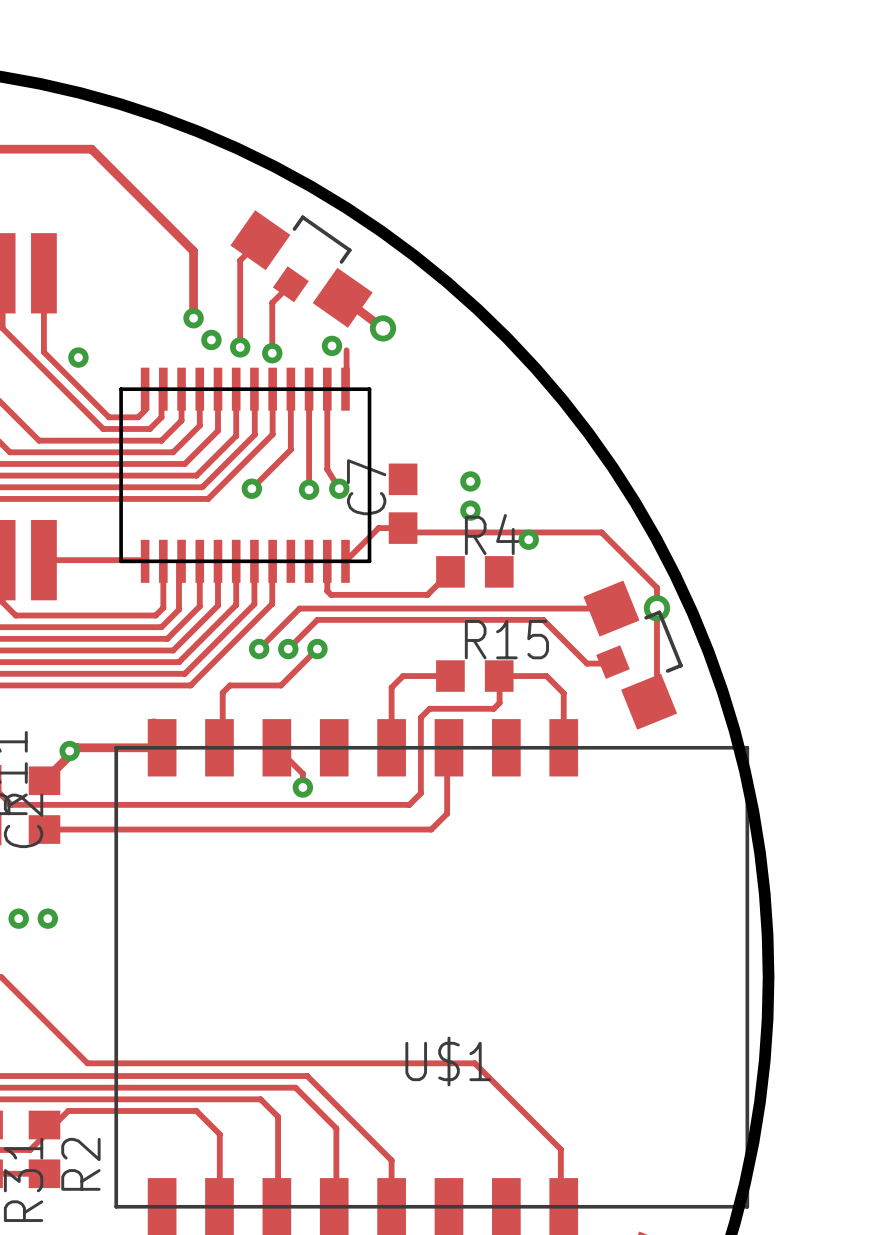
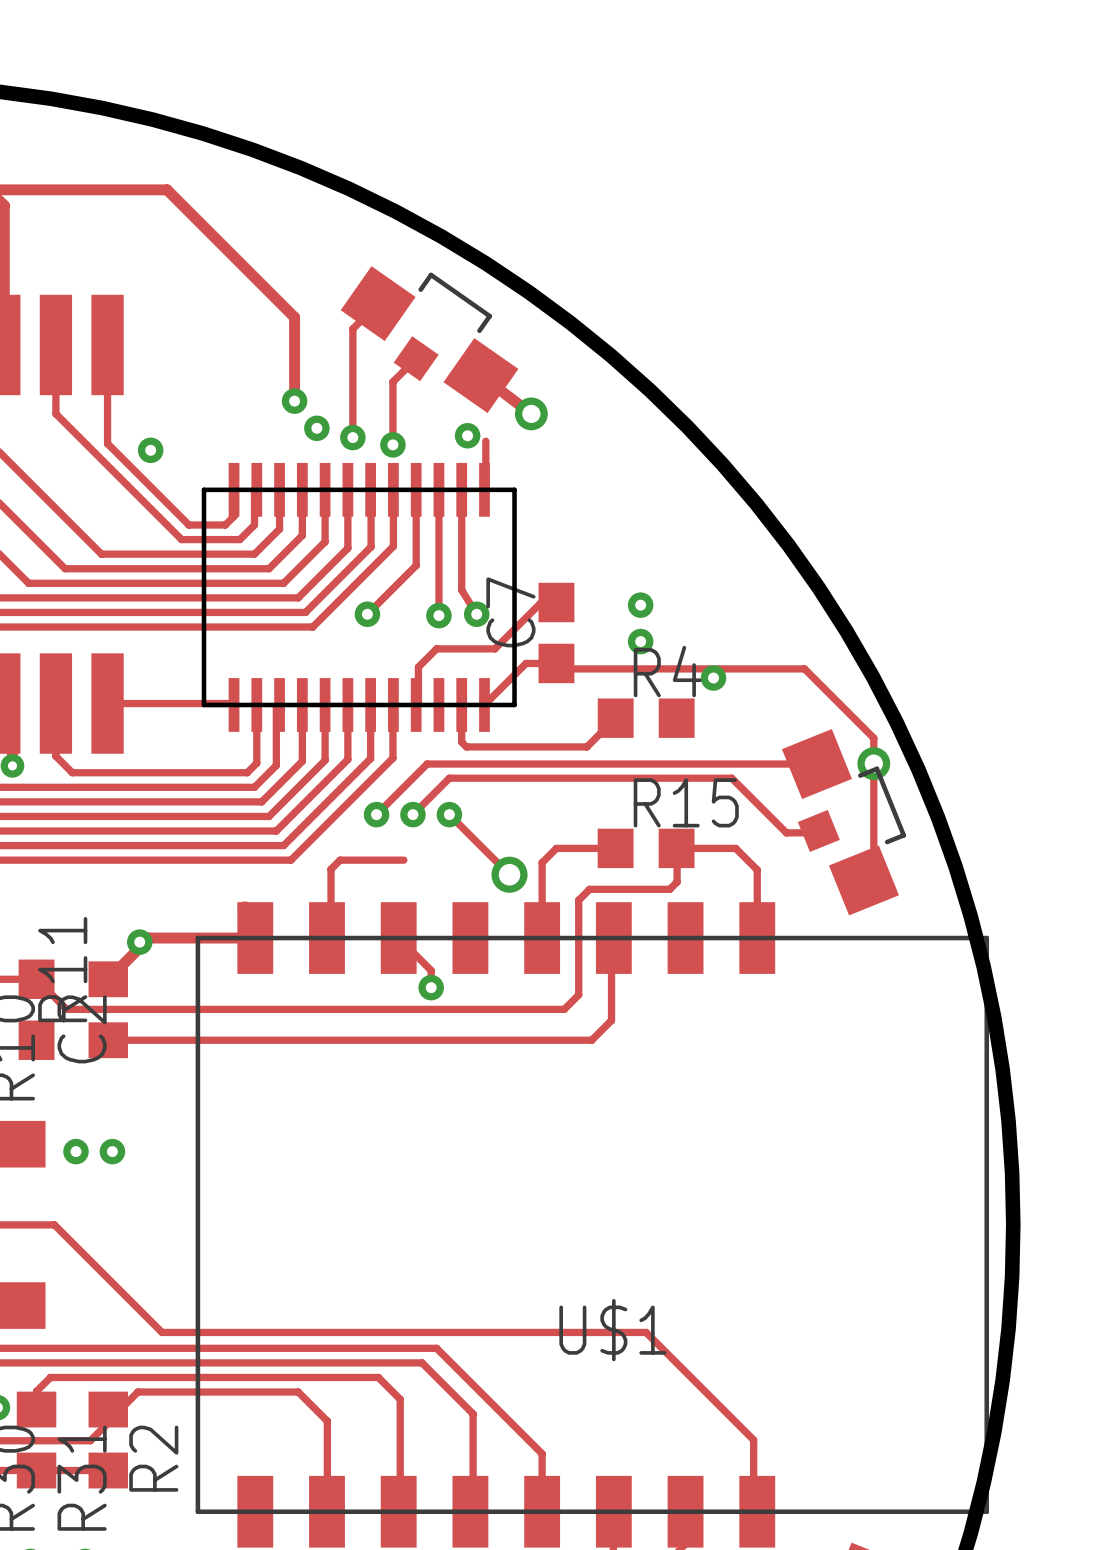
track: none -> (556, 602) (541, 602) (494, 648) (436, 648) (418, 667) (418, 702) (416, 704)
track: (317, 649) (281, 685) -> (449, 814) (509, 874)
via: none -> (509, 874)

